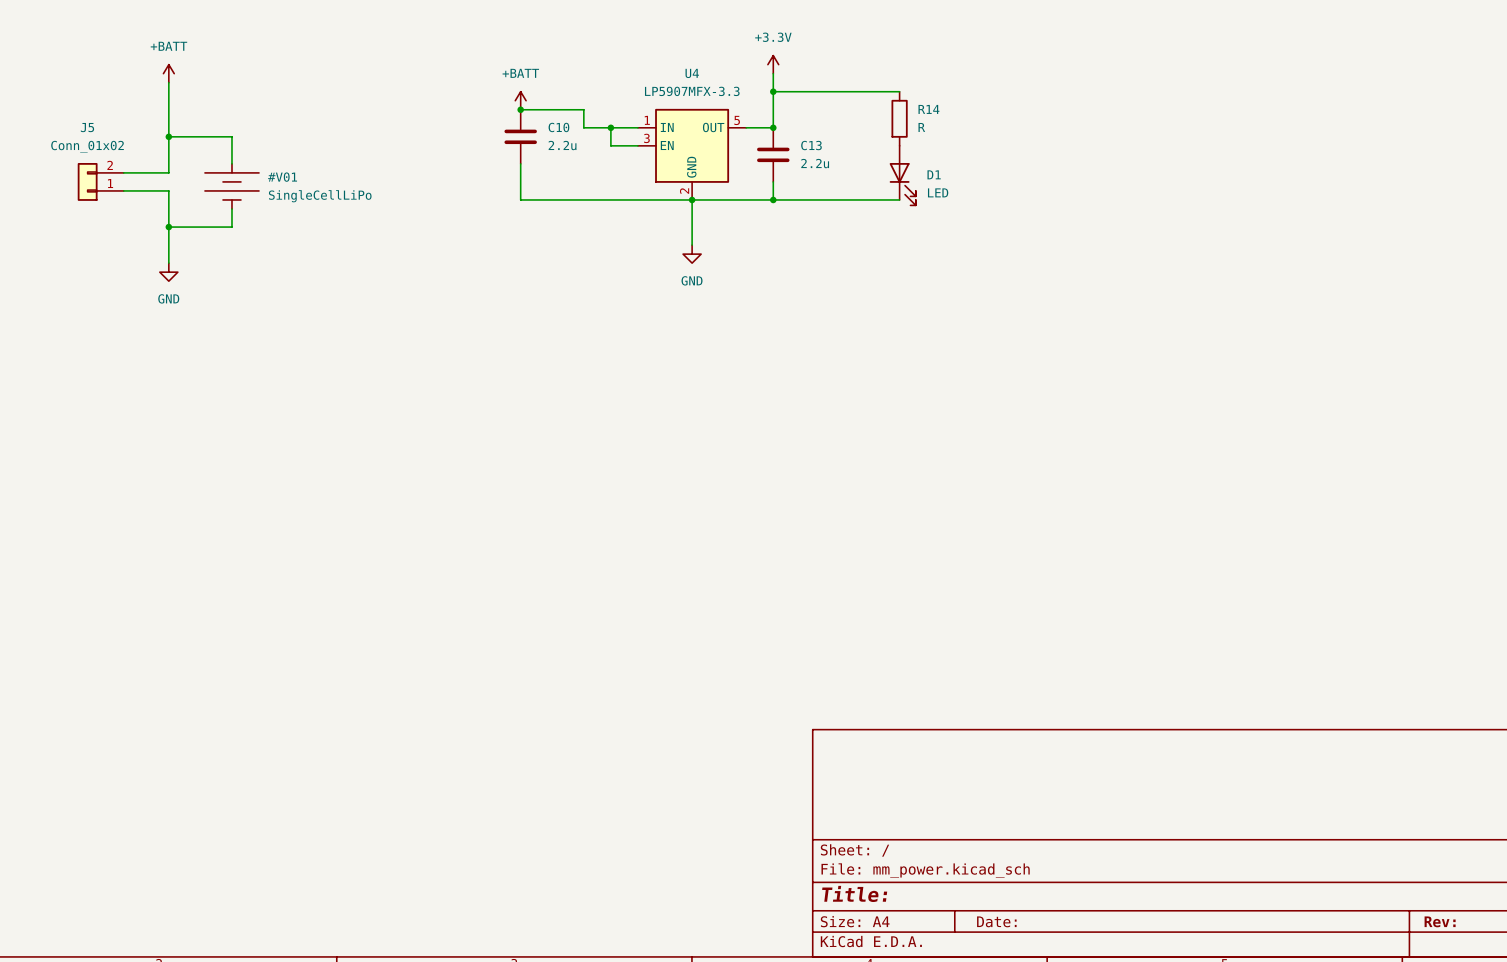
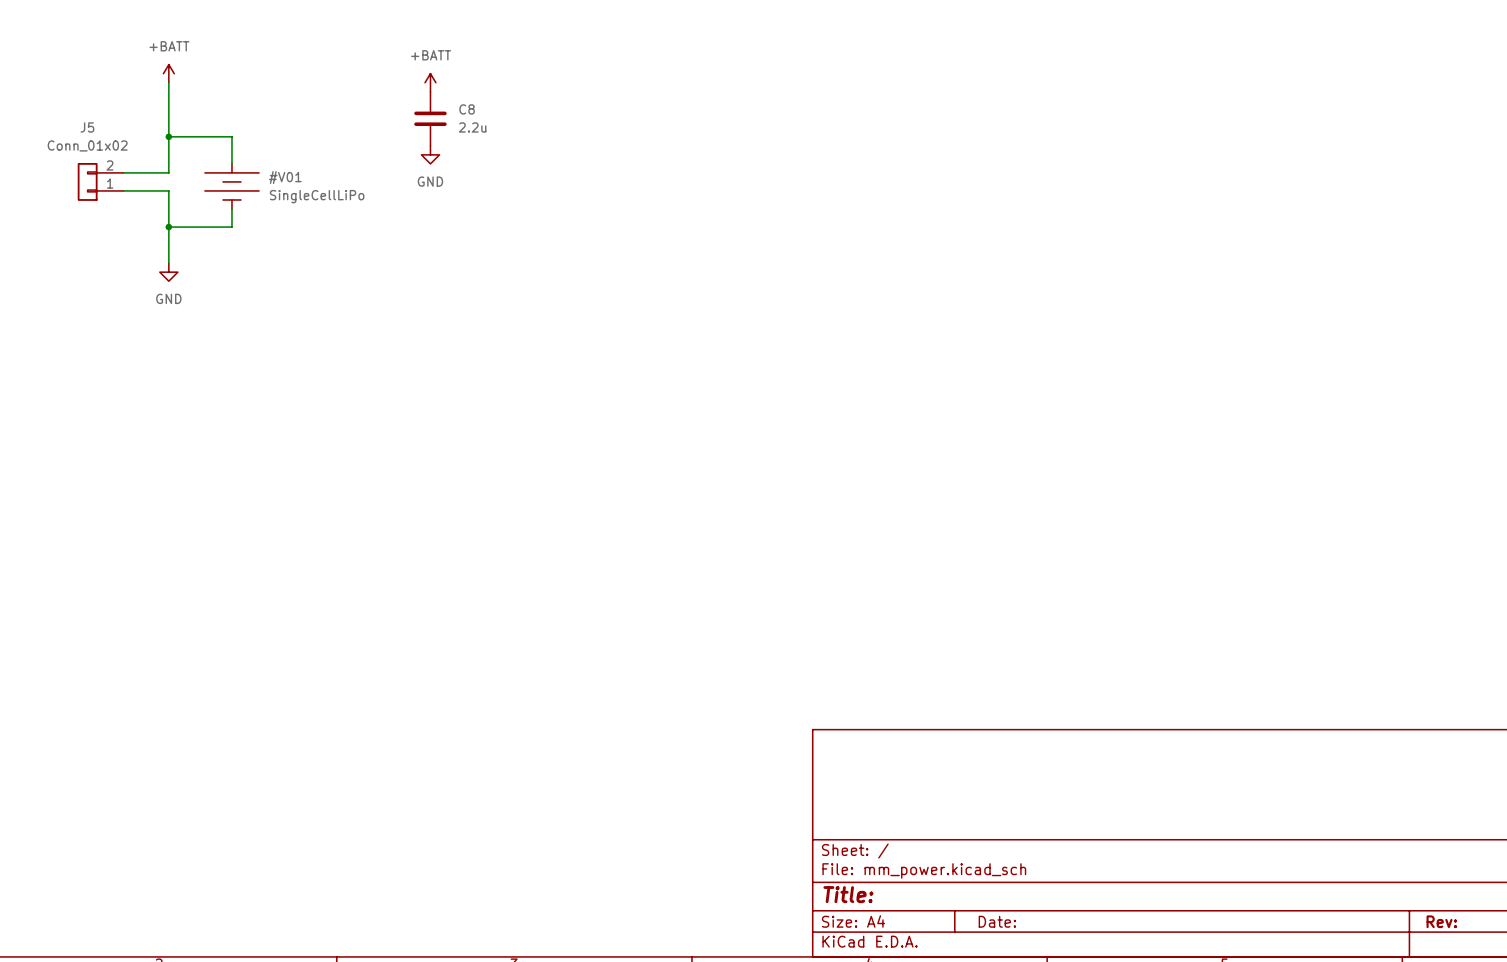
power symbol: +3.3V (773, 64) -> none
wire: (773, 73) (773, 127) (746, 127) -> none
wire: (773, 91) (899, 91) -> none
junction: (773, 91) -> none
power symbol position: +BATT (520, 100) -> +BATT (430, 82)
wire: (520, 109) (583, 109) (583, 127) (637, 127) -> none
junction: (520, 109) -> none
C8: none -> 2.2u (430, 118)
R14: R (899, 118) -> none
wire: (610, 127) (610, 145) (637, 145) -> none
junction: (610, 127) -> none
junction: (773, 127) -> none
C10: 2.2u (520, 136) -> none
power symbol: none -> GND (430, 154)
U4: LP5907MFX-3.3 (692, 154) -> none
C13: 2.2u (773, 154) -> none
wire: (520, 163) (520, 199) (899, 199) -> none
D1: LED (902, 175) -> none
wire: (773, 181) (773, 199) -> none
wire: (692, 199) (692, 245) -> none
junction: (692, 199) -> none
junction: (773, 199) -> none
power symbol: GND (692, 254) -> none

